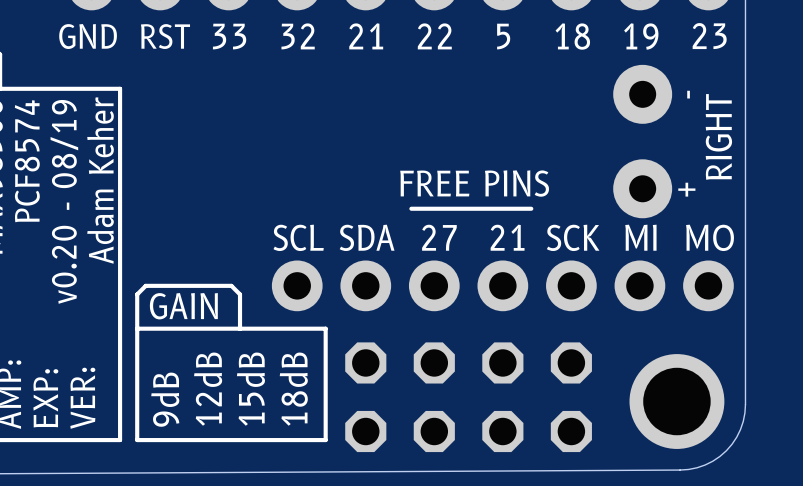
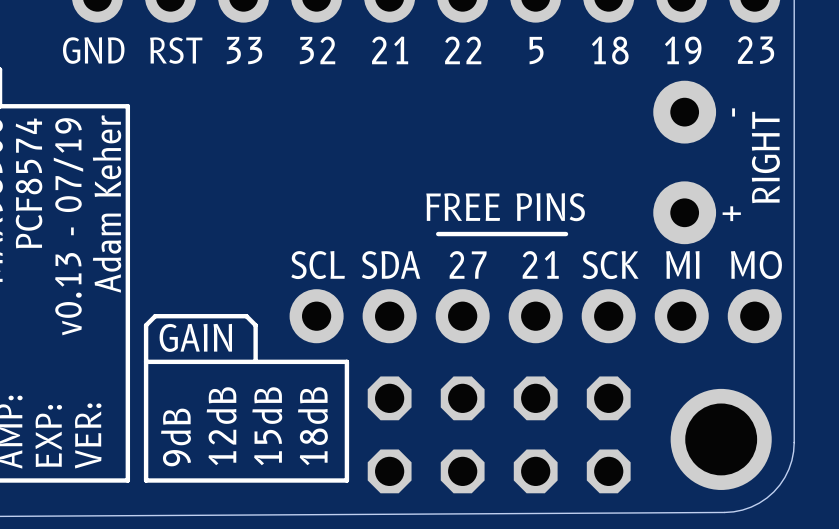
text: v0.20 - 08/19 (64, 201) -> v0.13 - 07/19 (68, 226)

